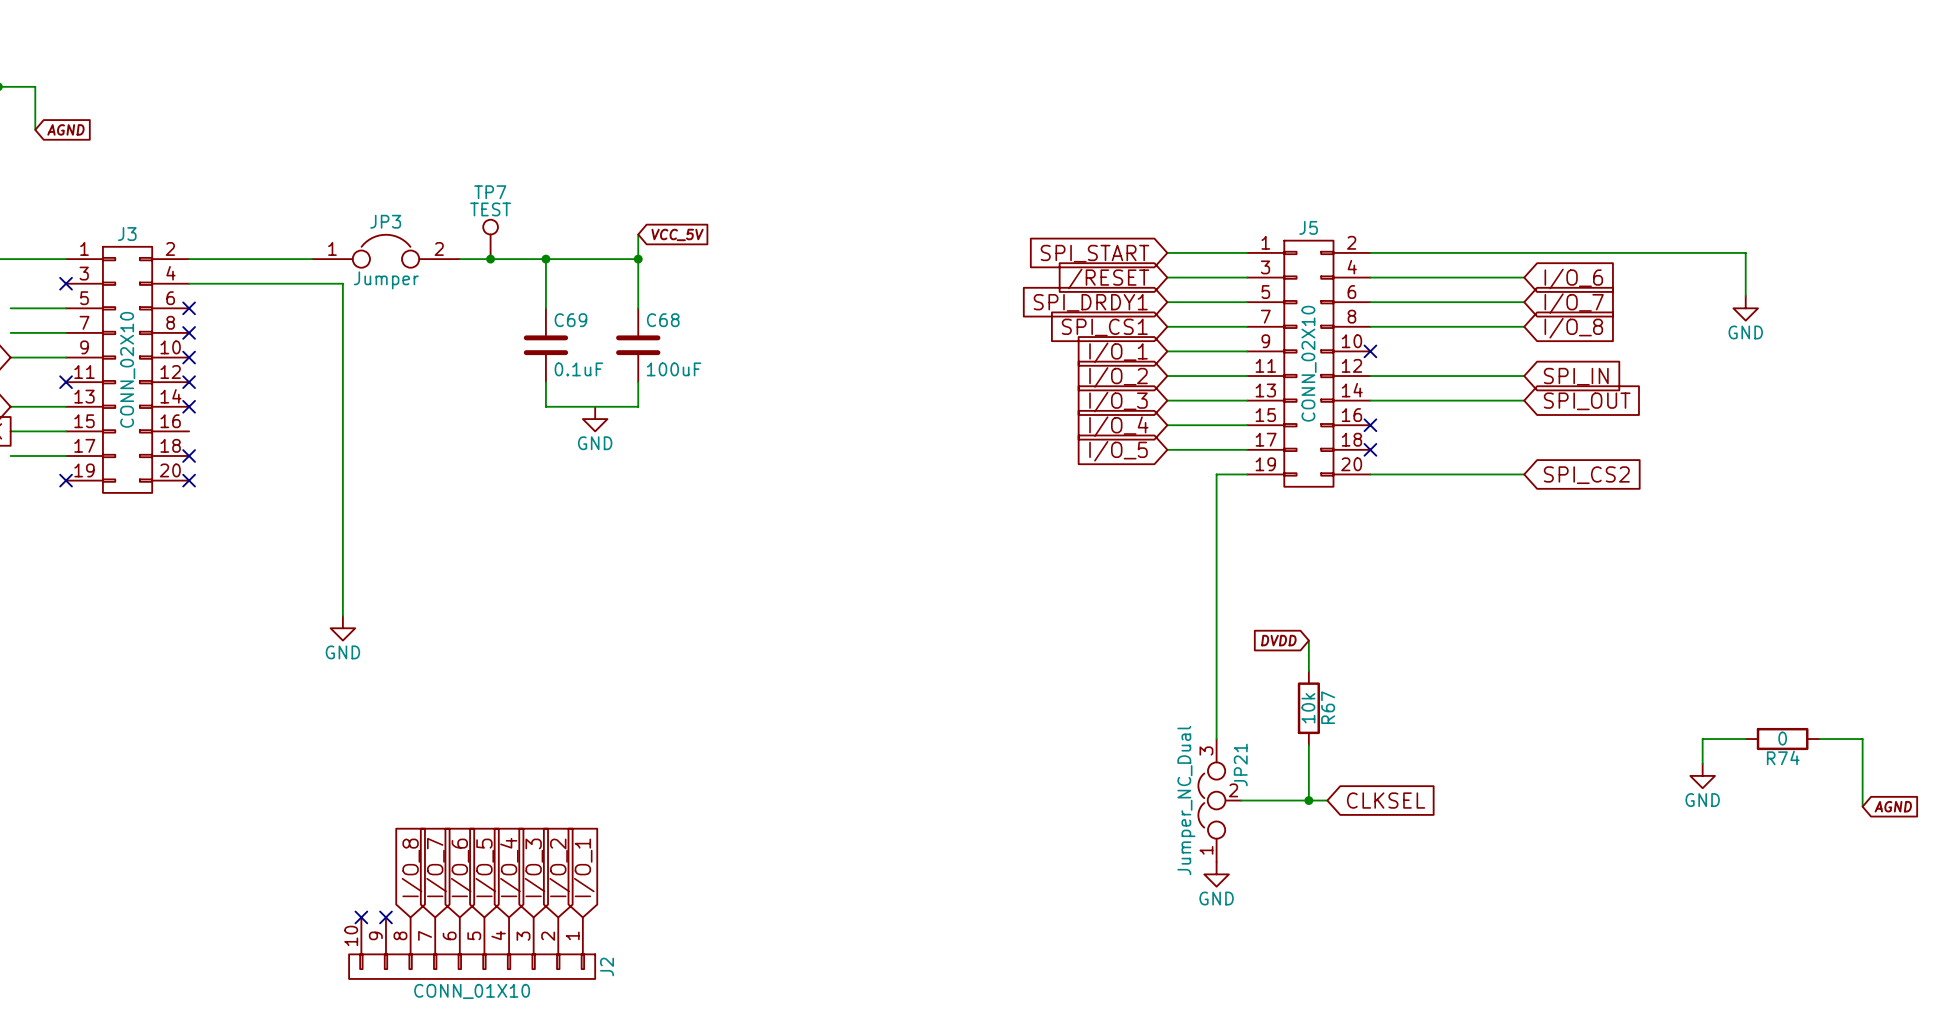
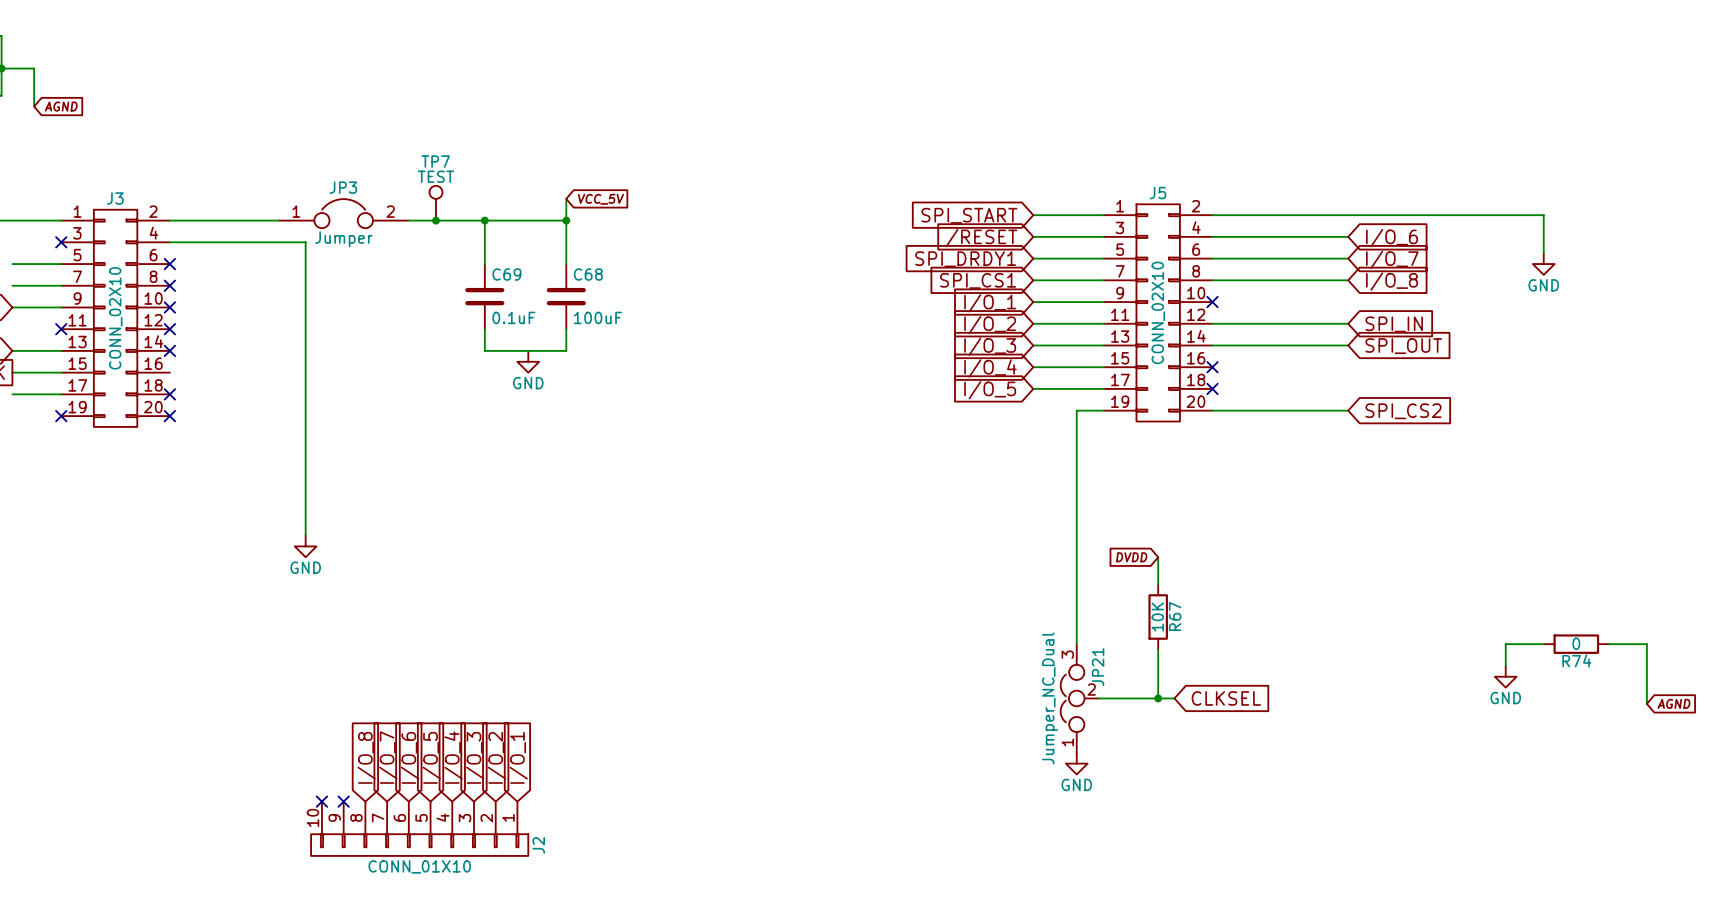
R67 value: 10k (1308, 708) -> 10K (1157, 617)

